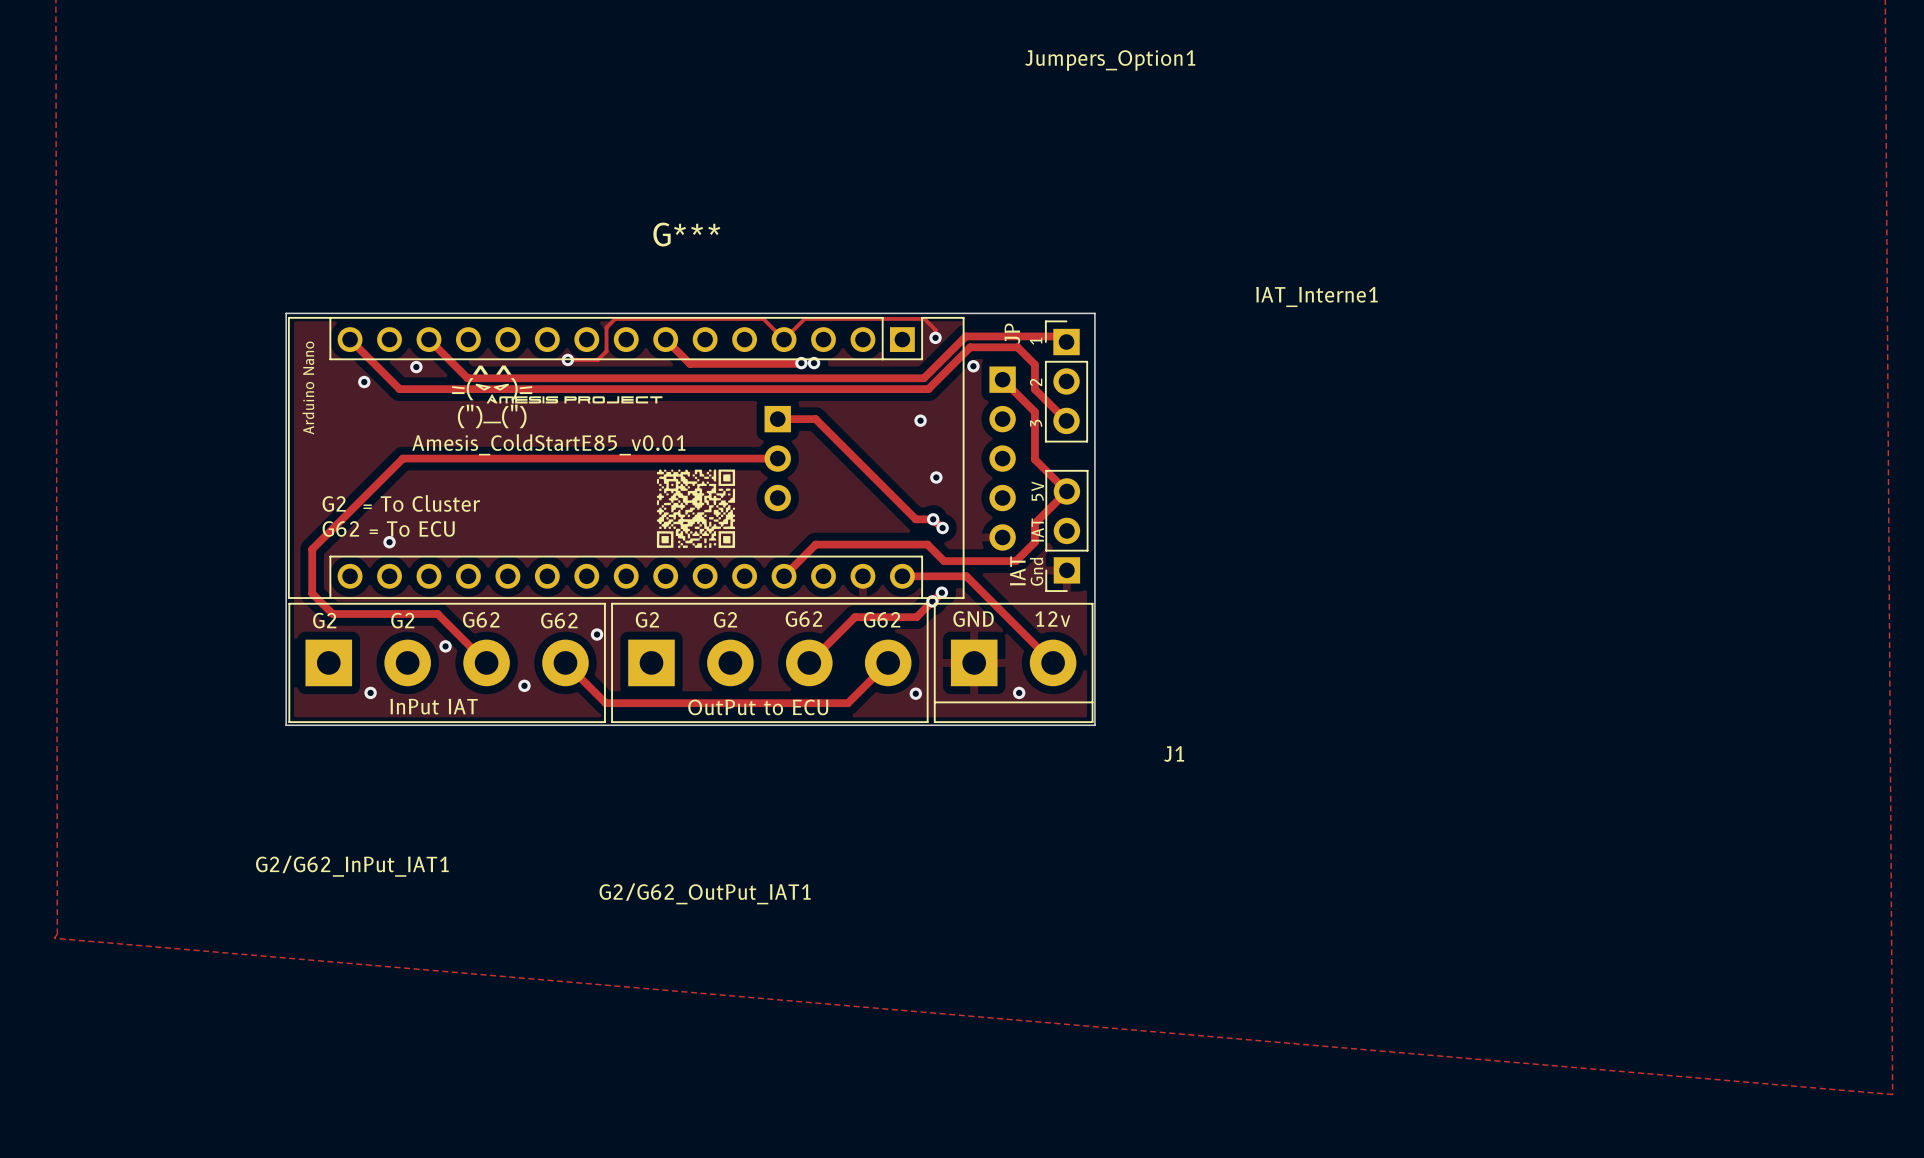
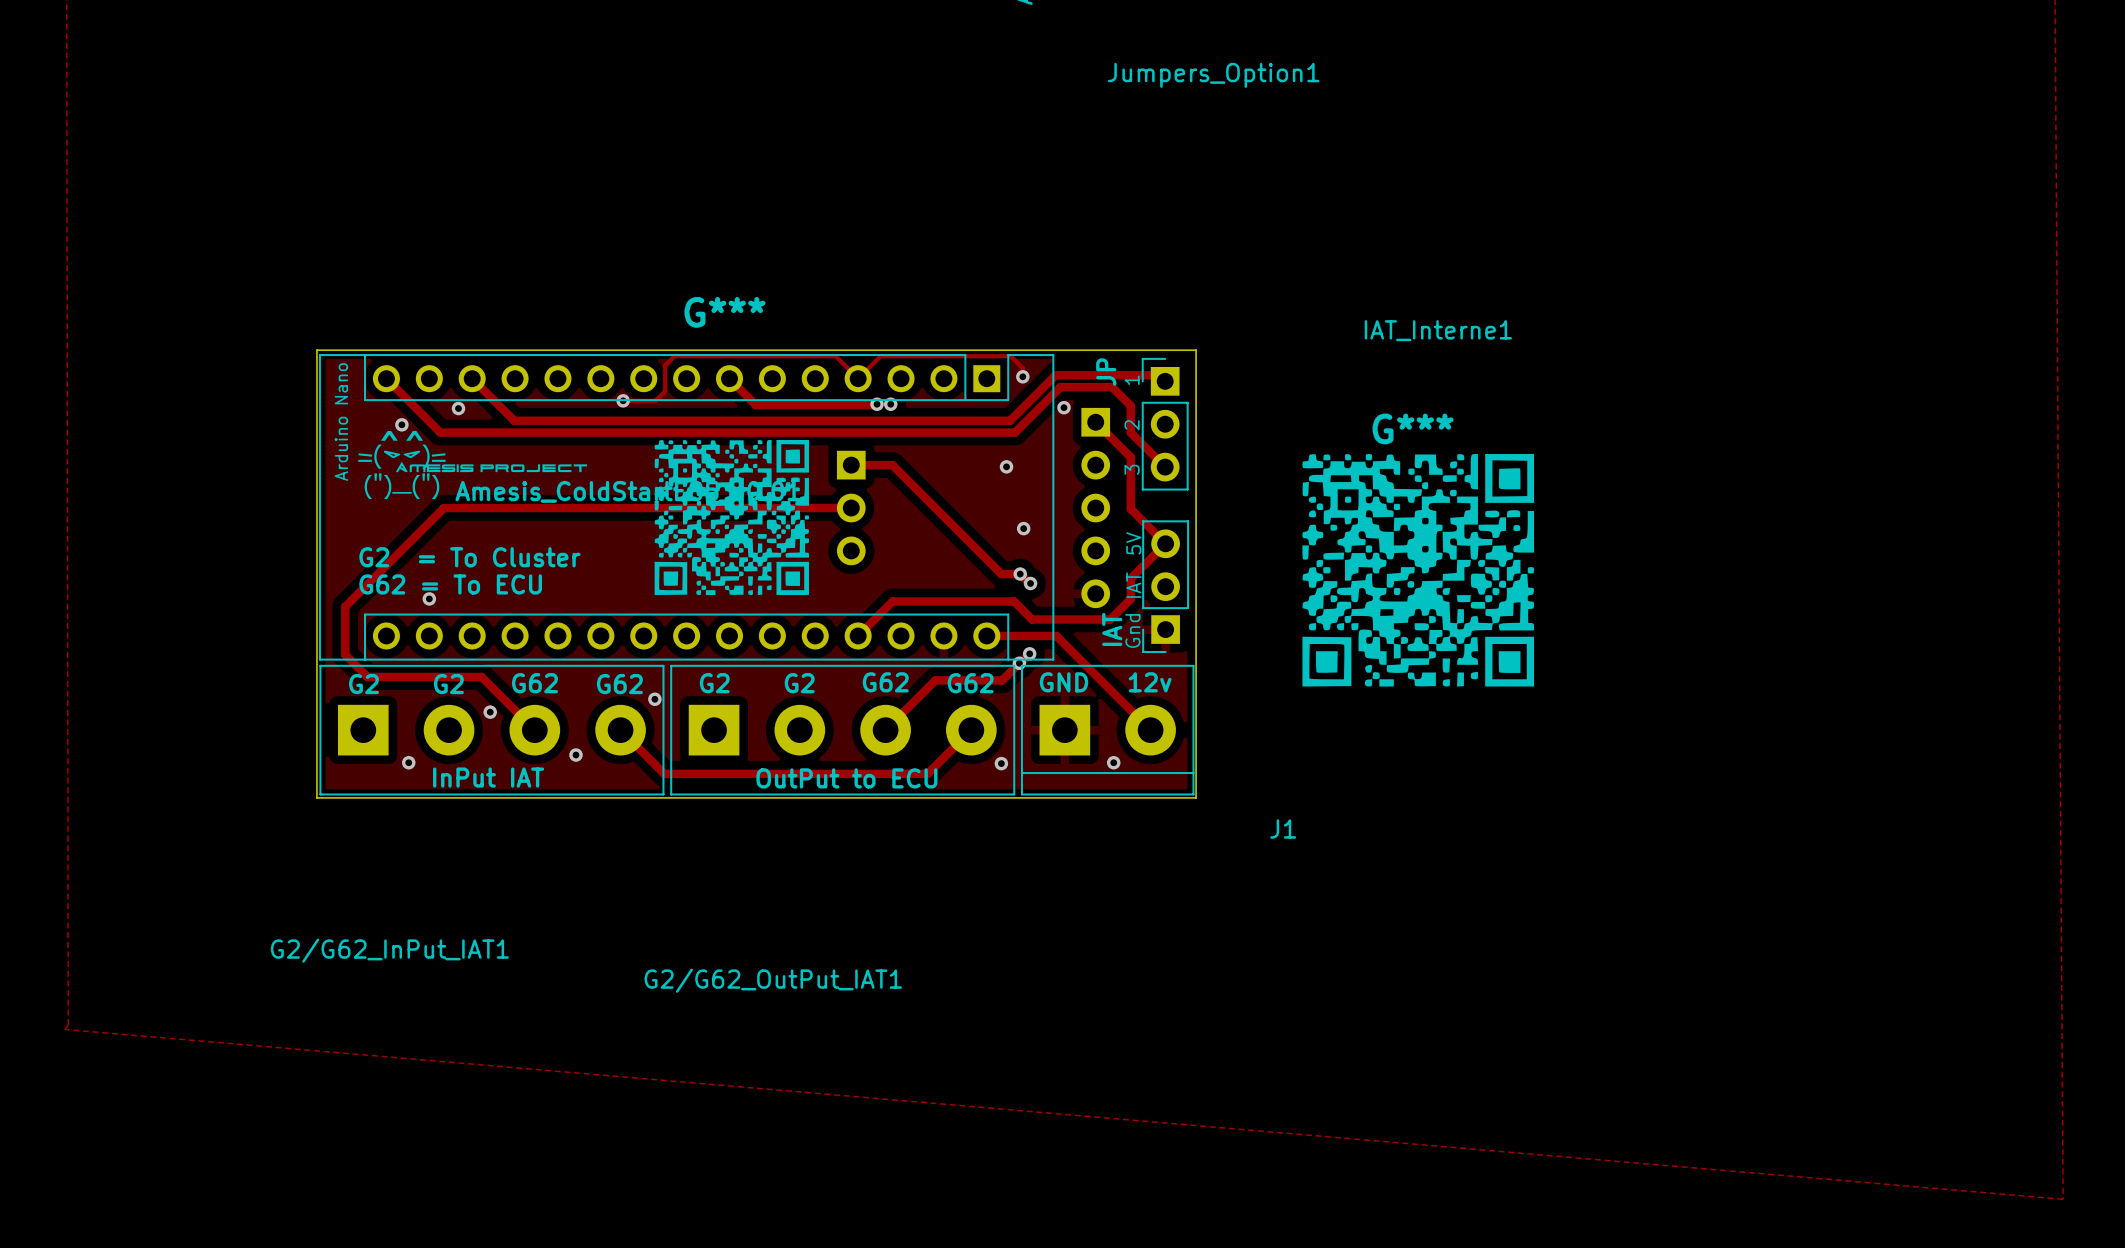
drawing position: (557, 396) -> (472, 464)
G***: none -> (731, 517)
G***: (695, 508) -> none
G***: none -> (1418, 570)

